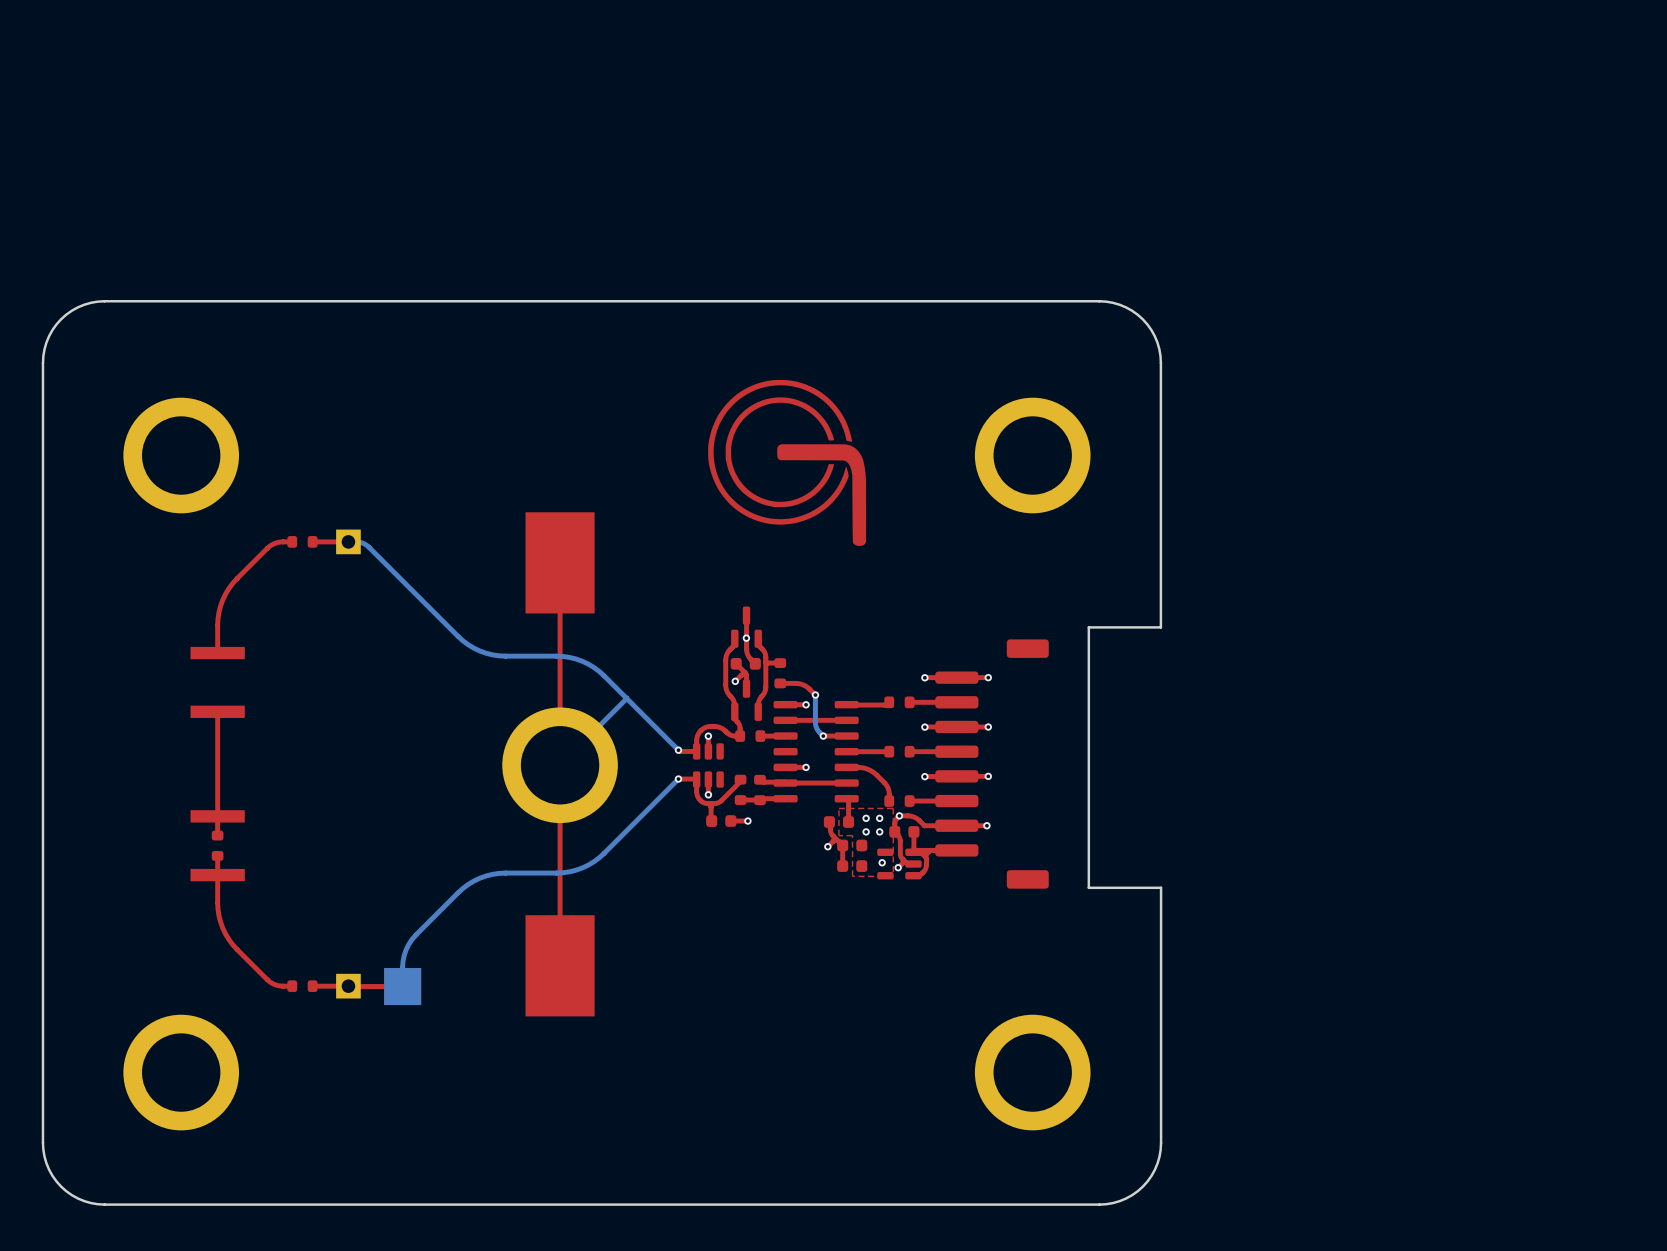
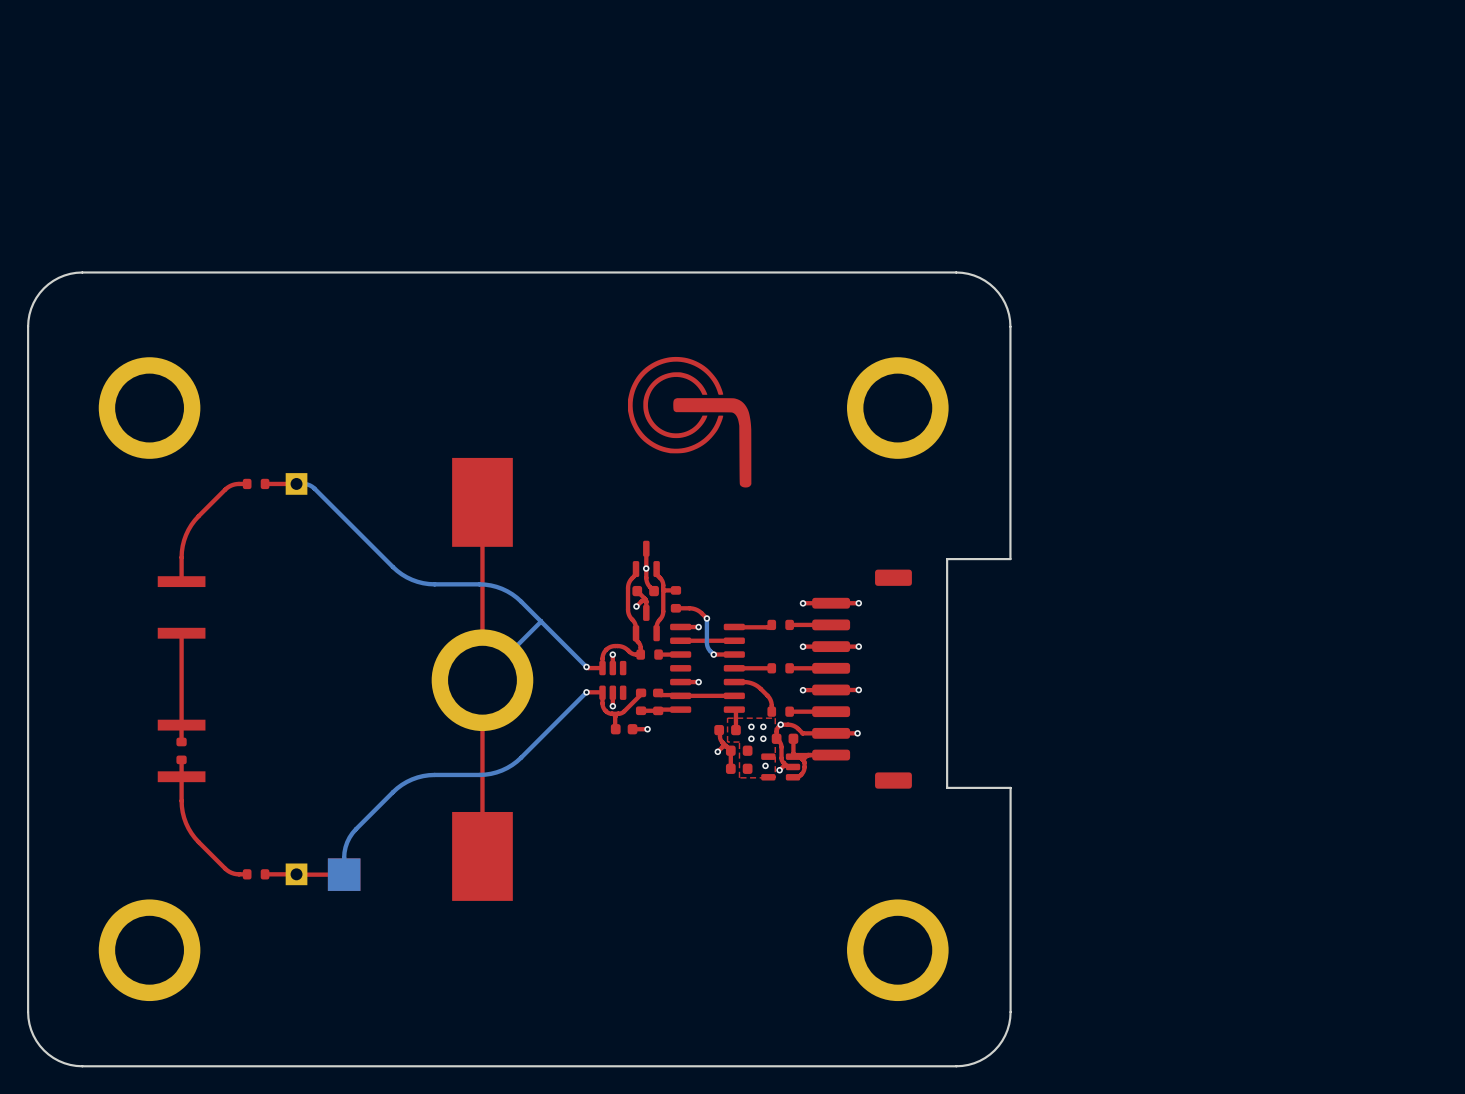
drawing: [708, 379, 867, 546] -> none
drawing: none -> [627, 356, 752, 488]

